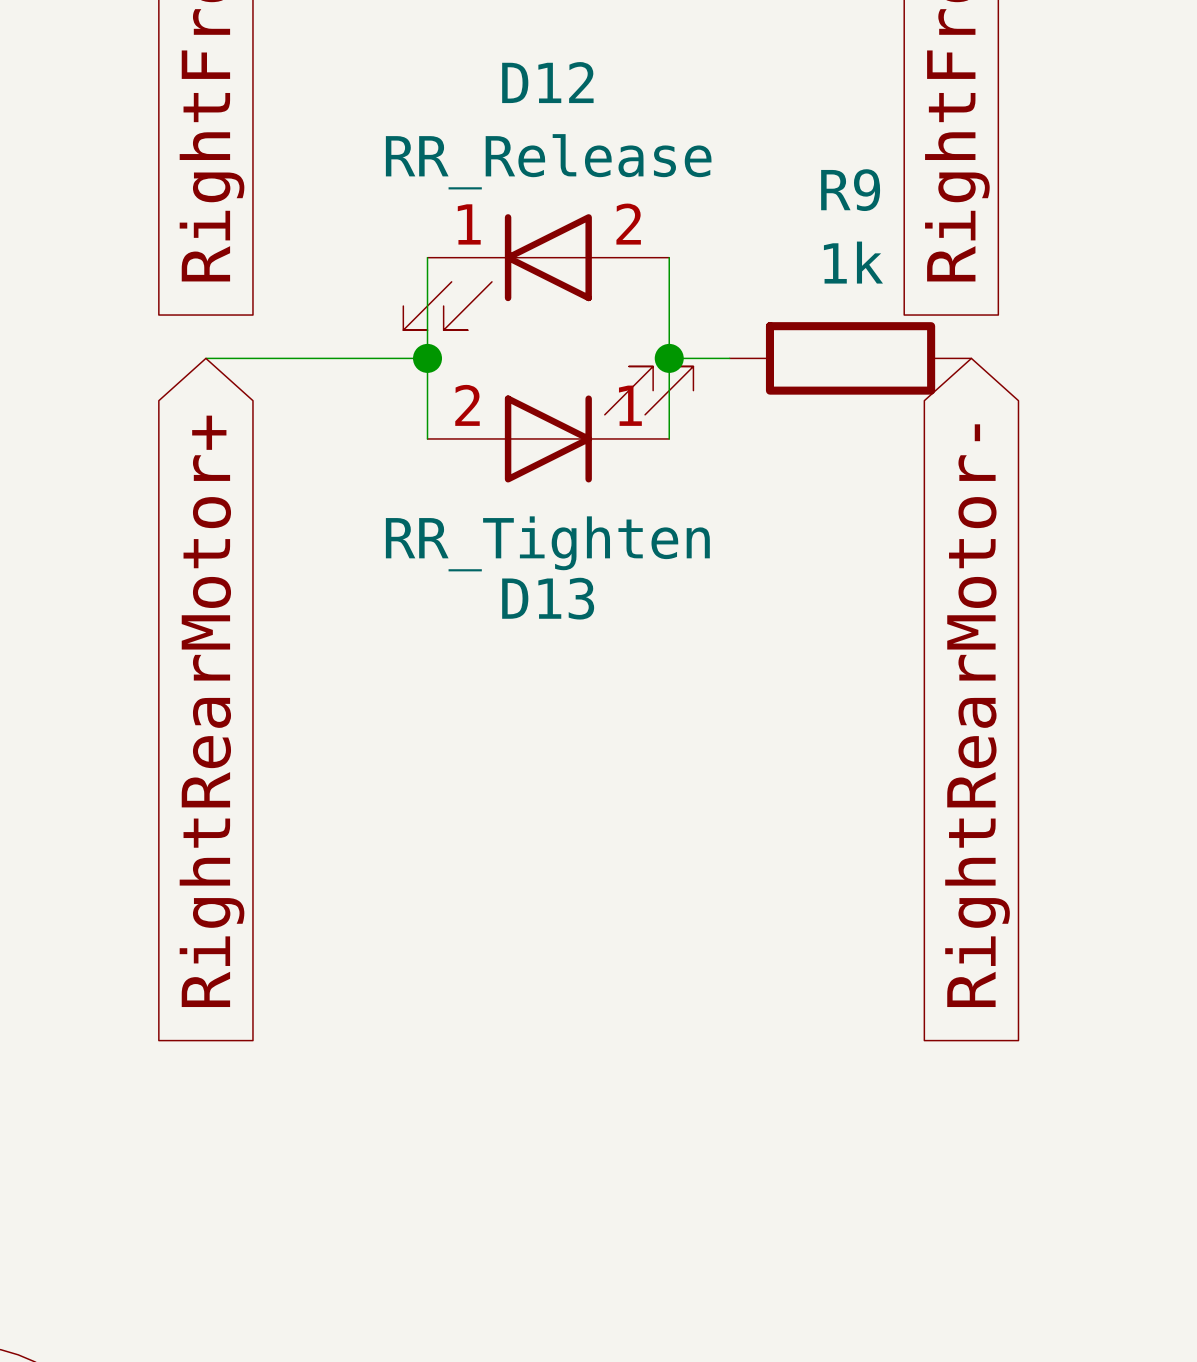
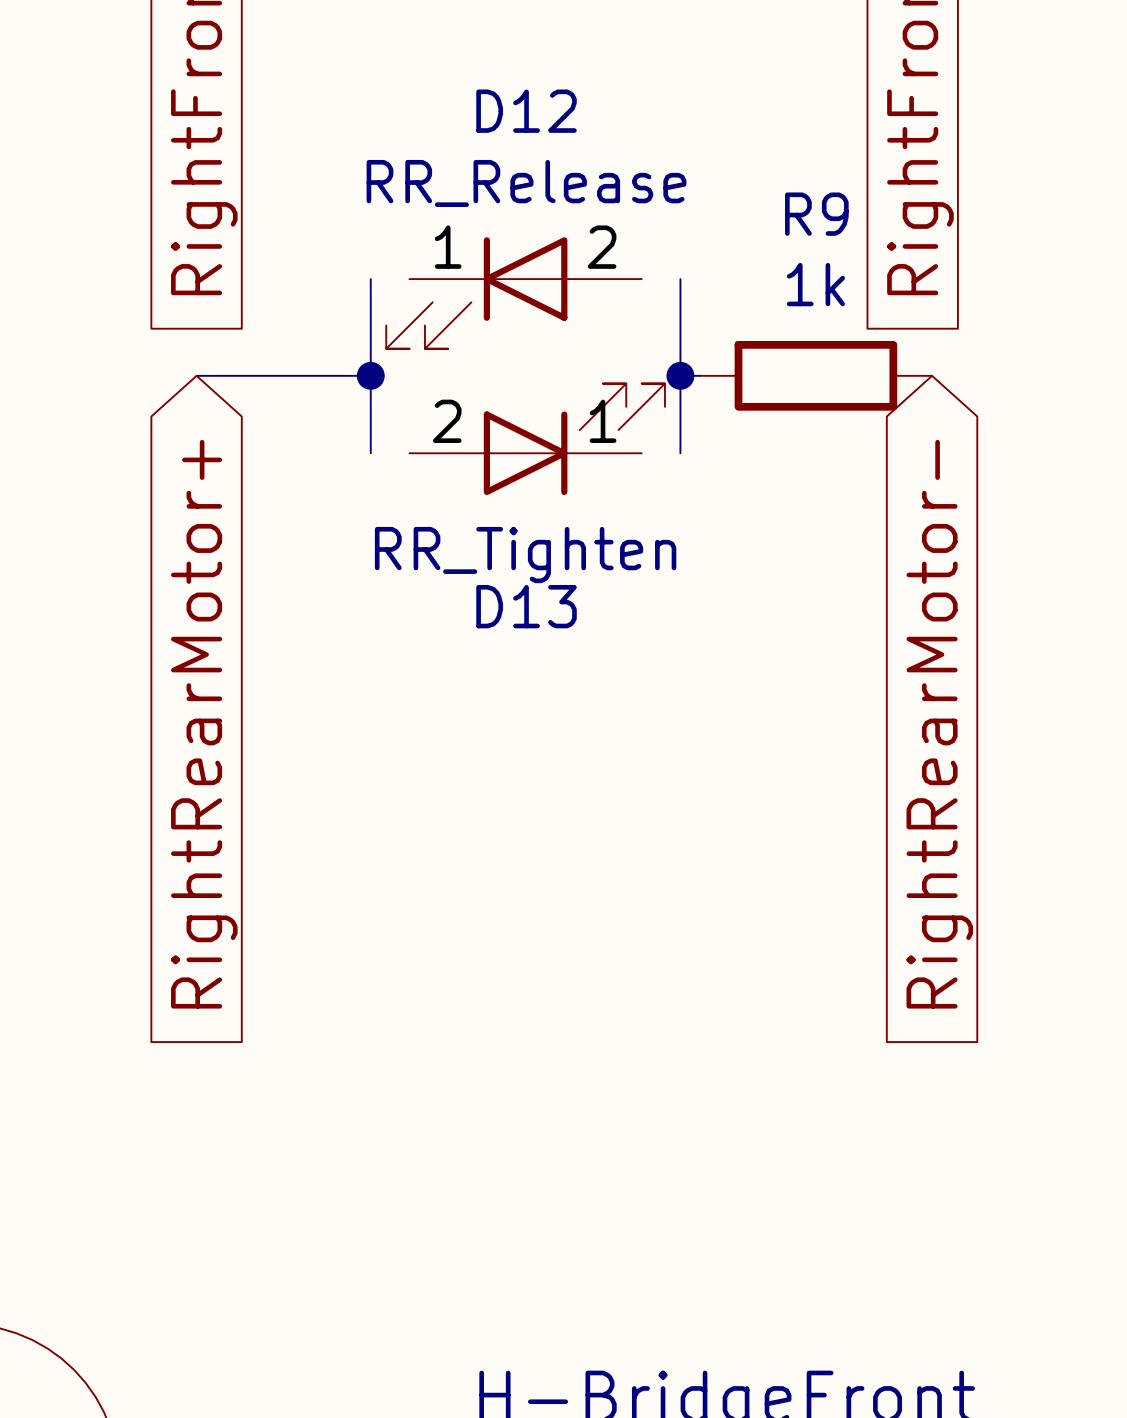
wire: (427, 257) (427, 438) -> (370, 279) (370, 453)
wire: (669, 257) (669, 438) -> (680, 279) (680, 453)
wire: (387, 358) (427, 358) -> none
junction position: (427, 358) -> (370, 375)
wire: (669, 358) (709, 358) -> none
junction position: (669, 358) -> (680, 375)

